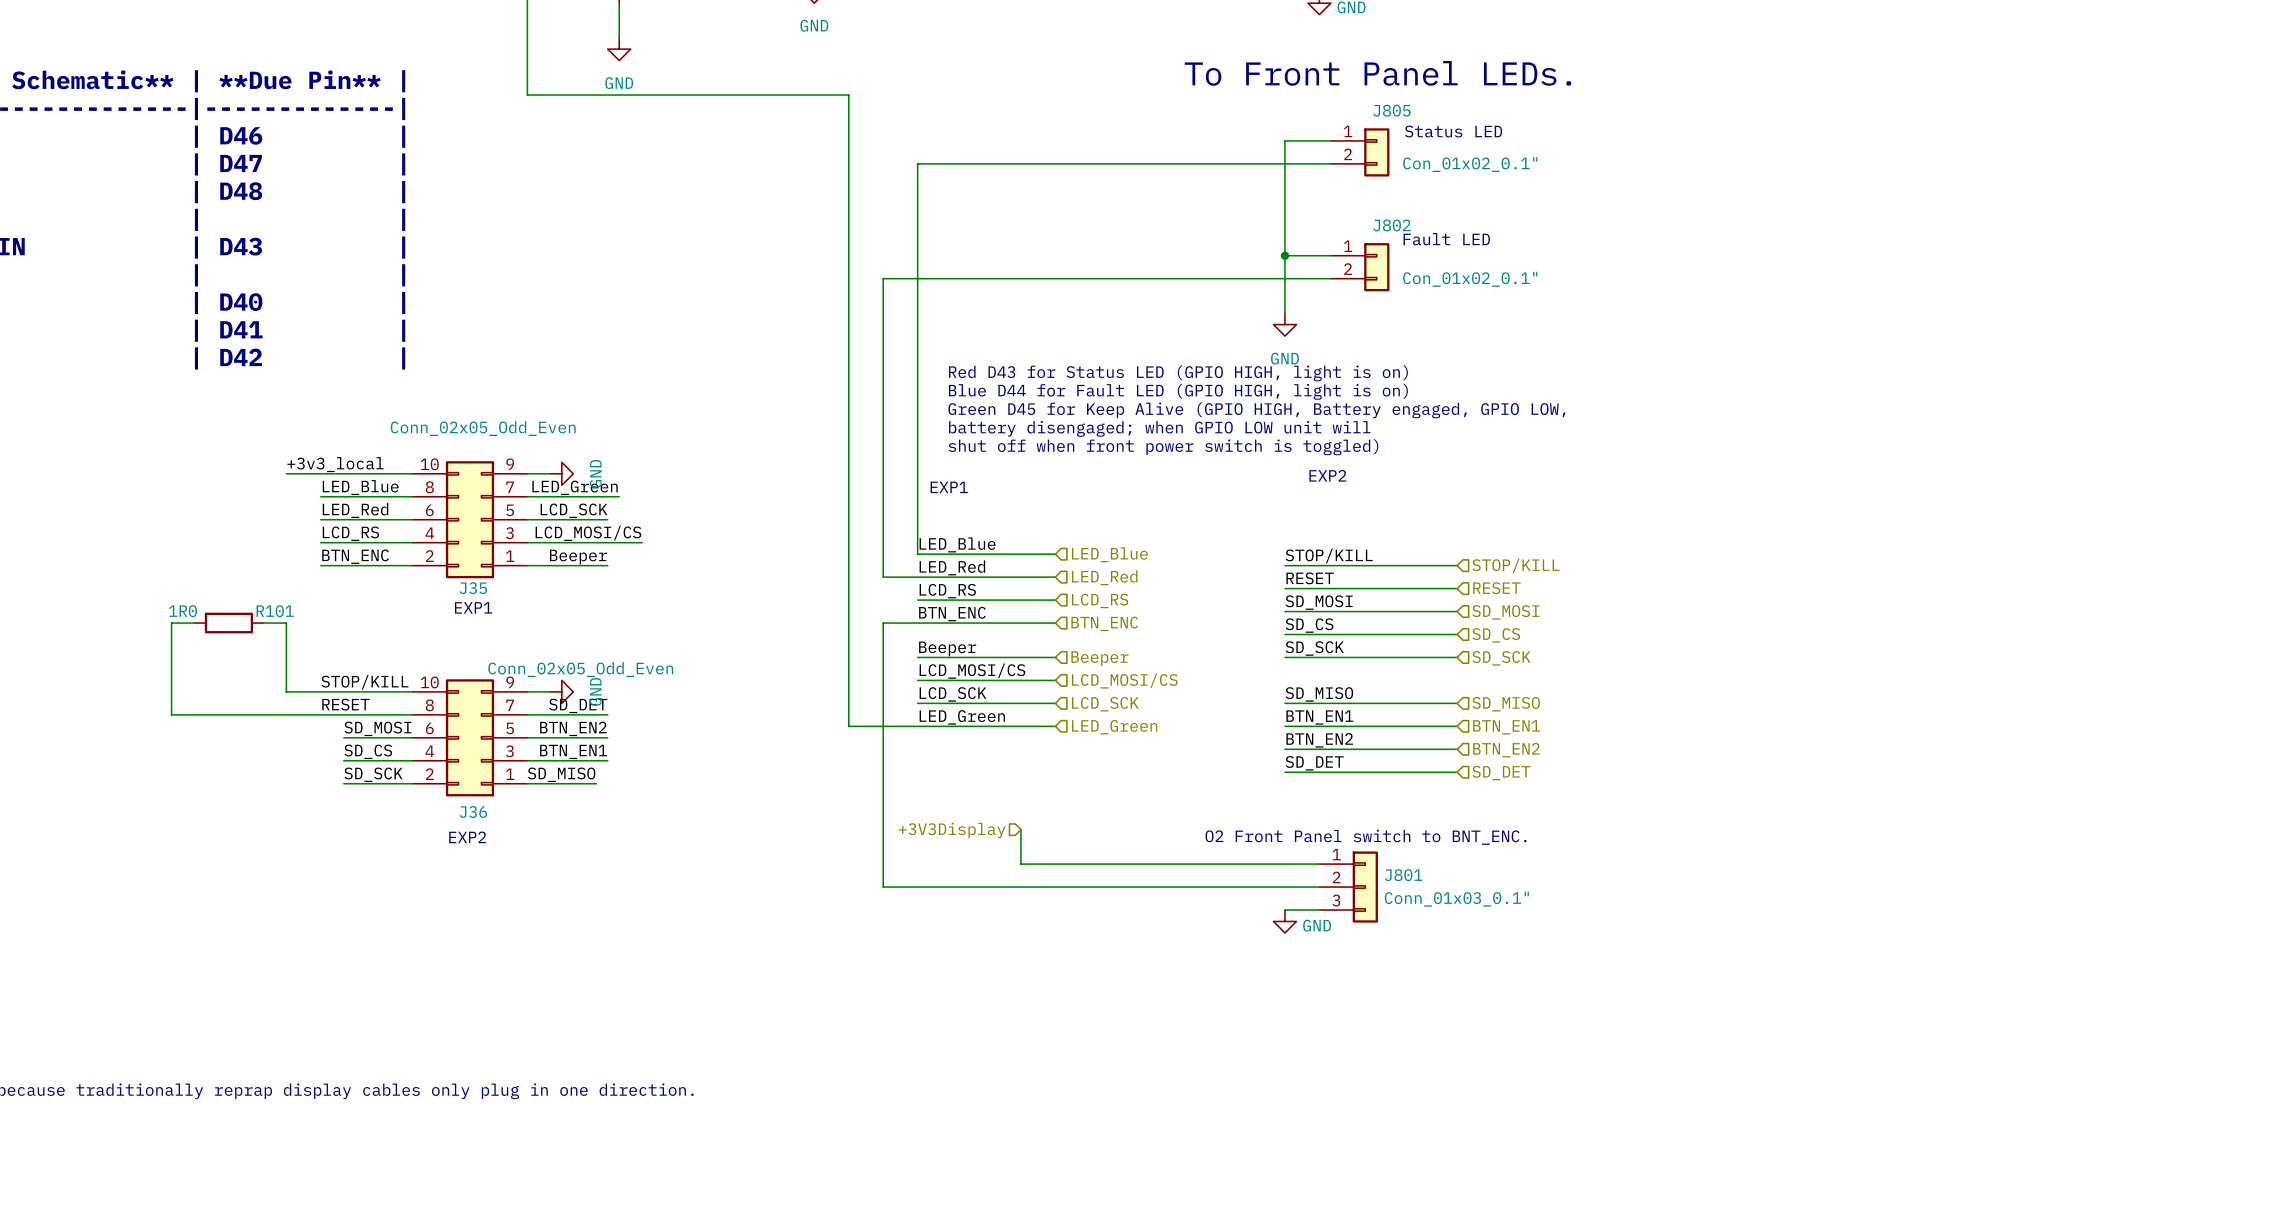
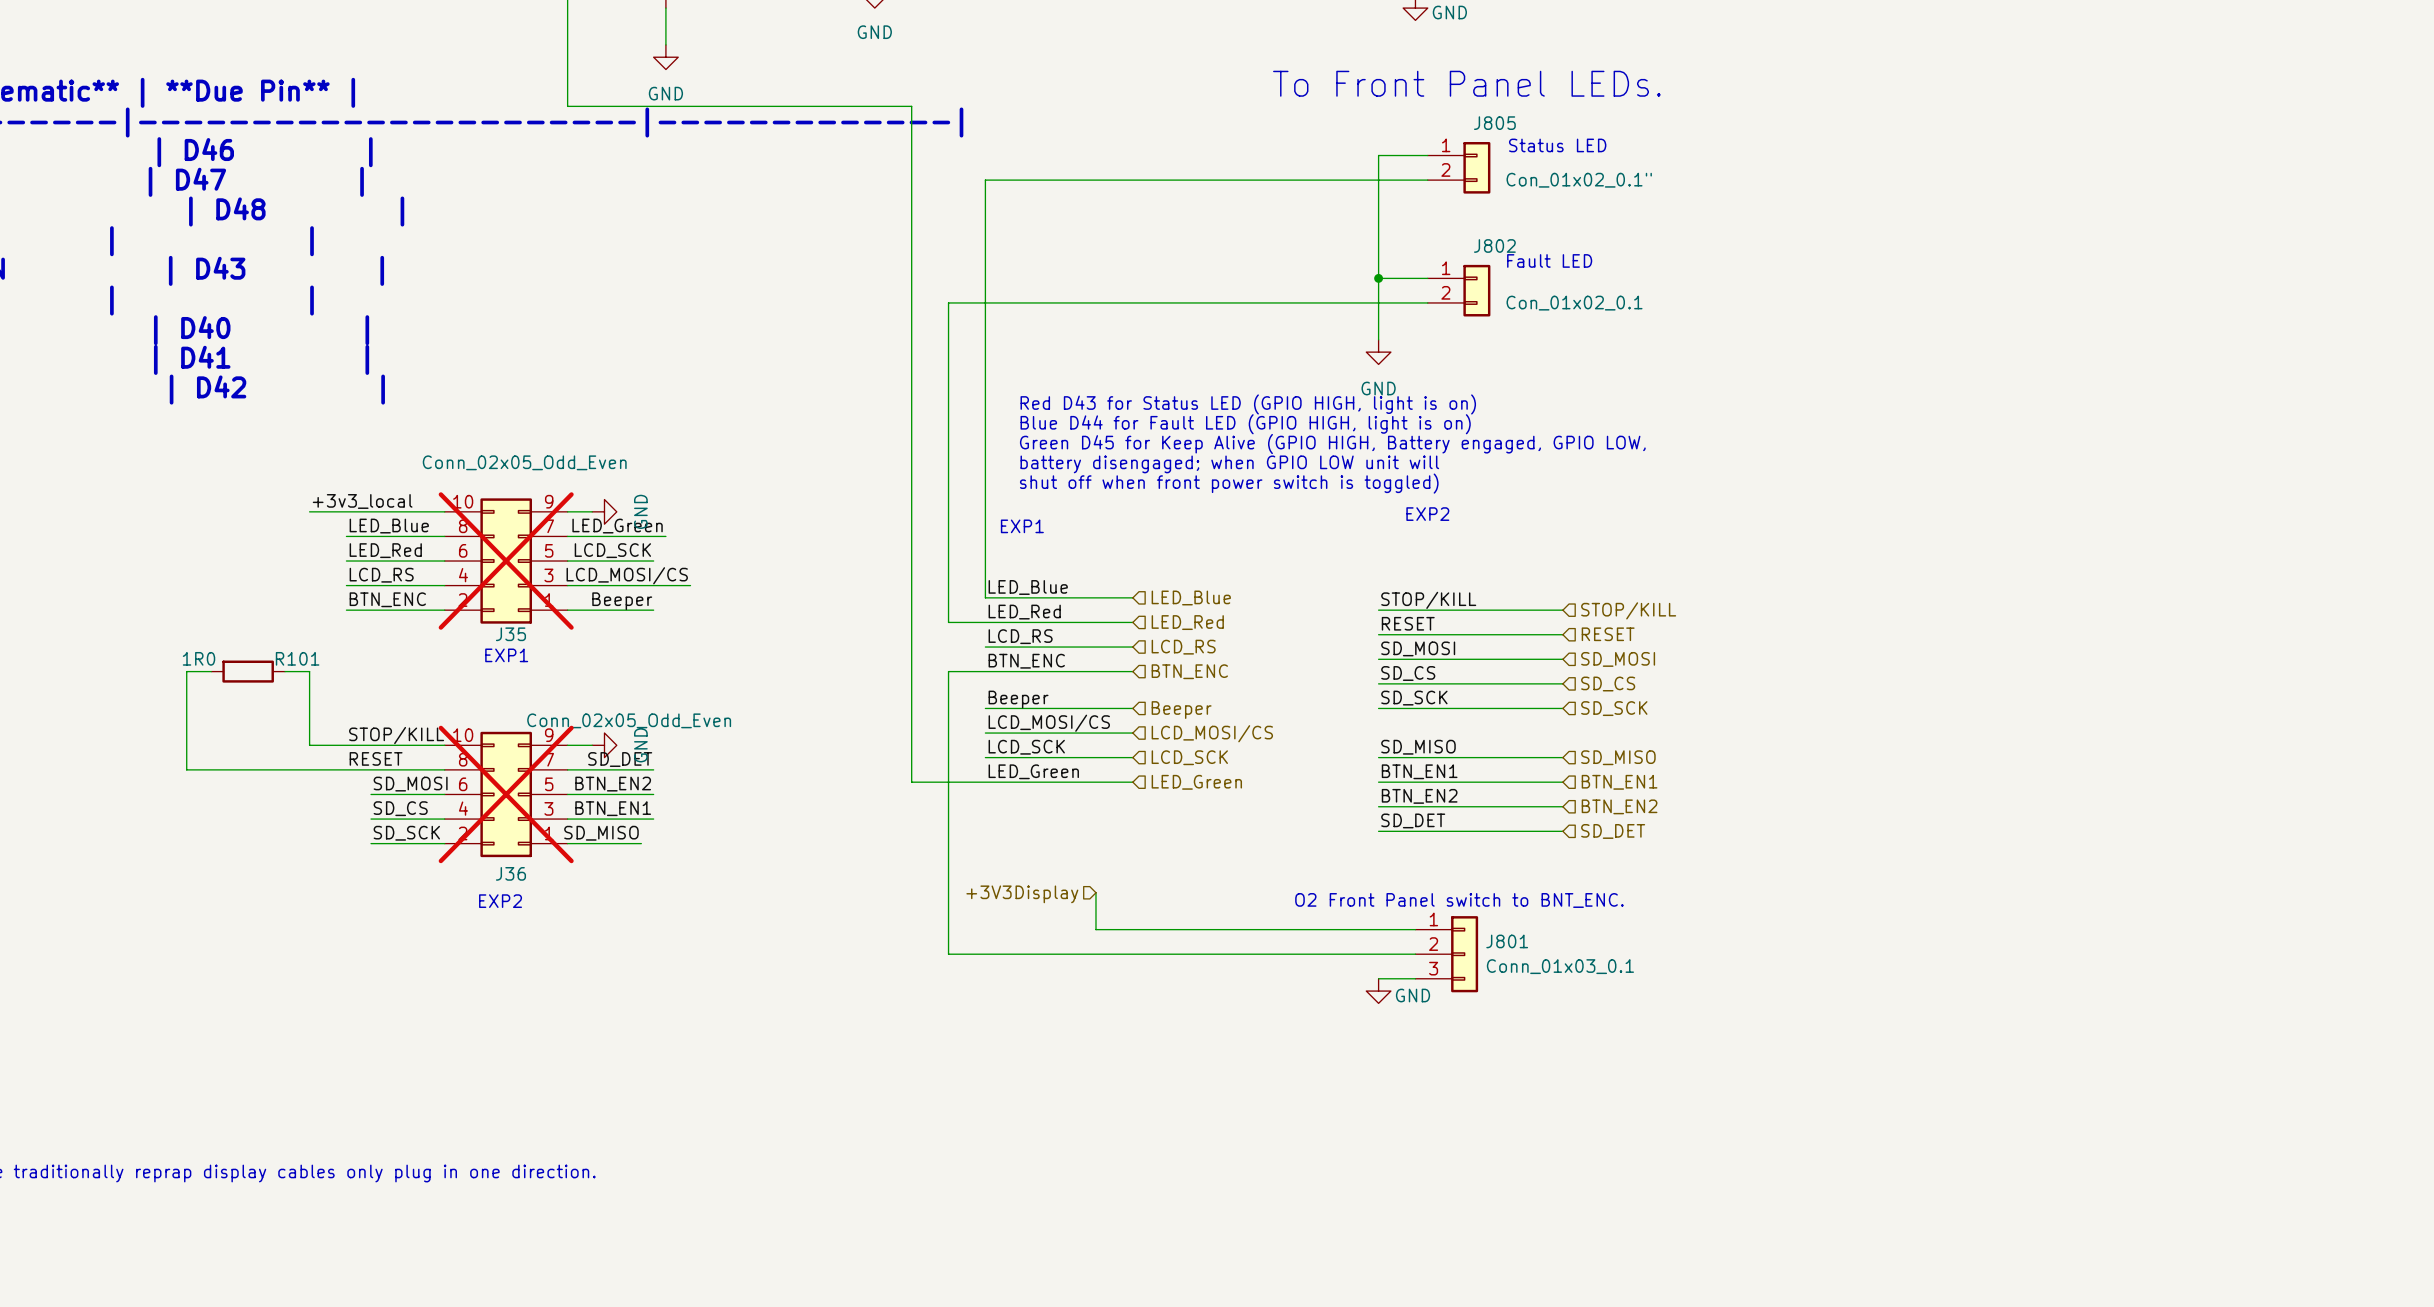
J802 value: Con_01x02_0.1" (1470, 279) -> Con_01x02_0.1 (1574, 303)
J35 do-not-place cross: none -> (506, 561)
J36 do-not-place cross: none -> (506, 794)
J801 value: Conn_01x03_0.1" (1456, 899) -> Conn_01x03_0.1 (1560, 966)

